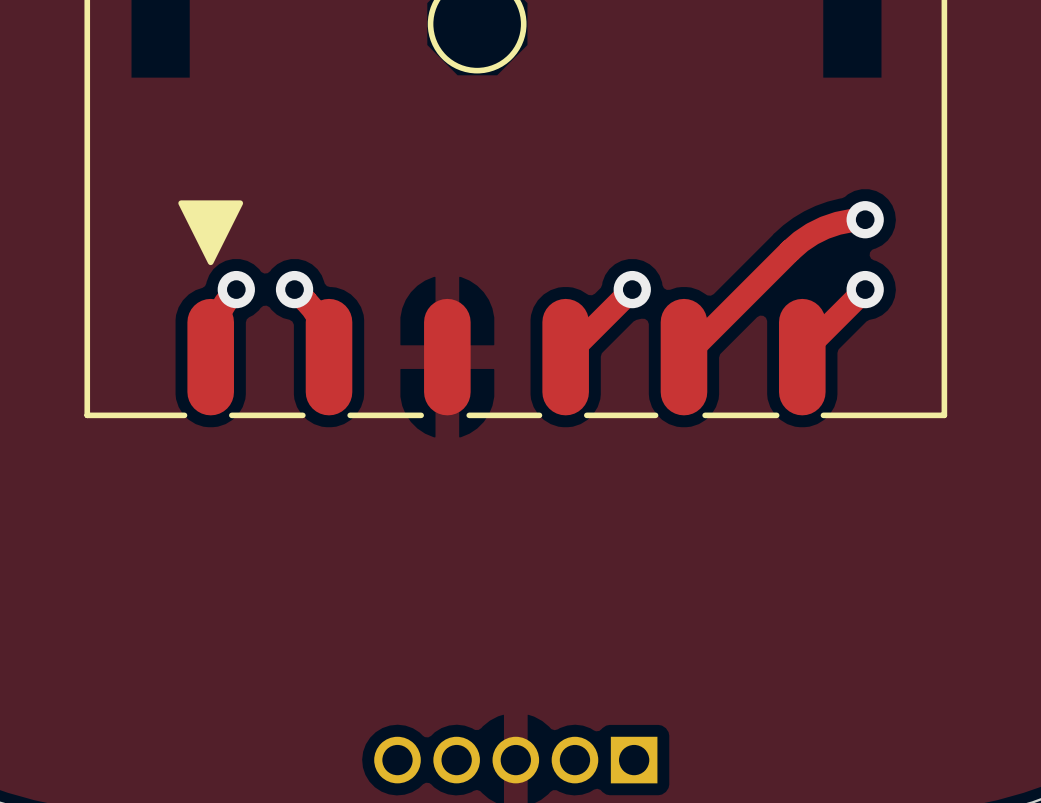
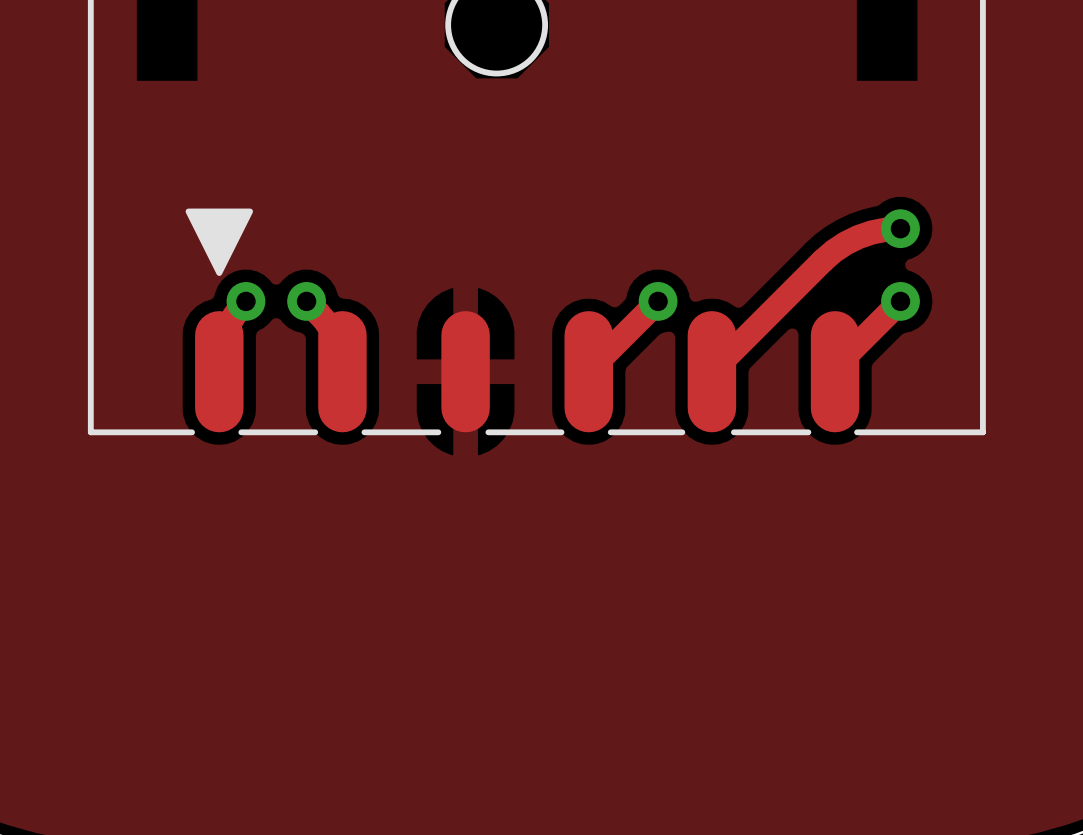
part: (515, 760) -> none

